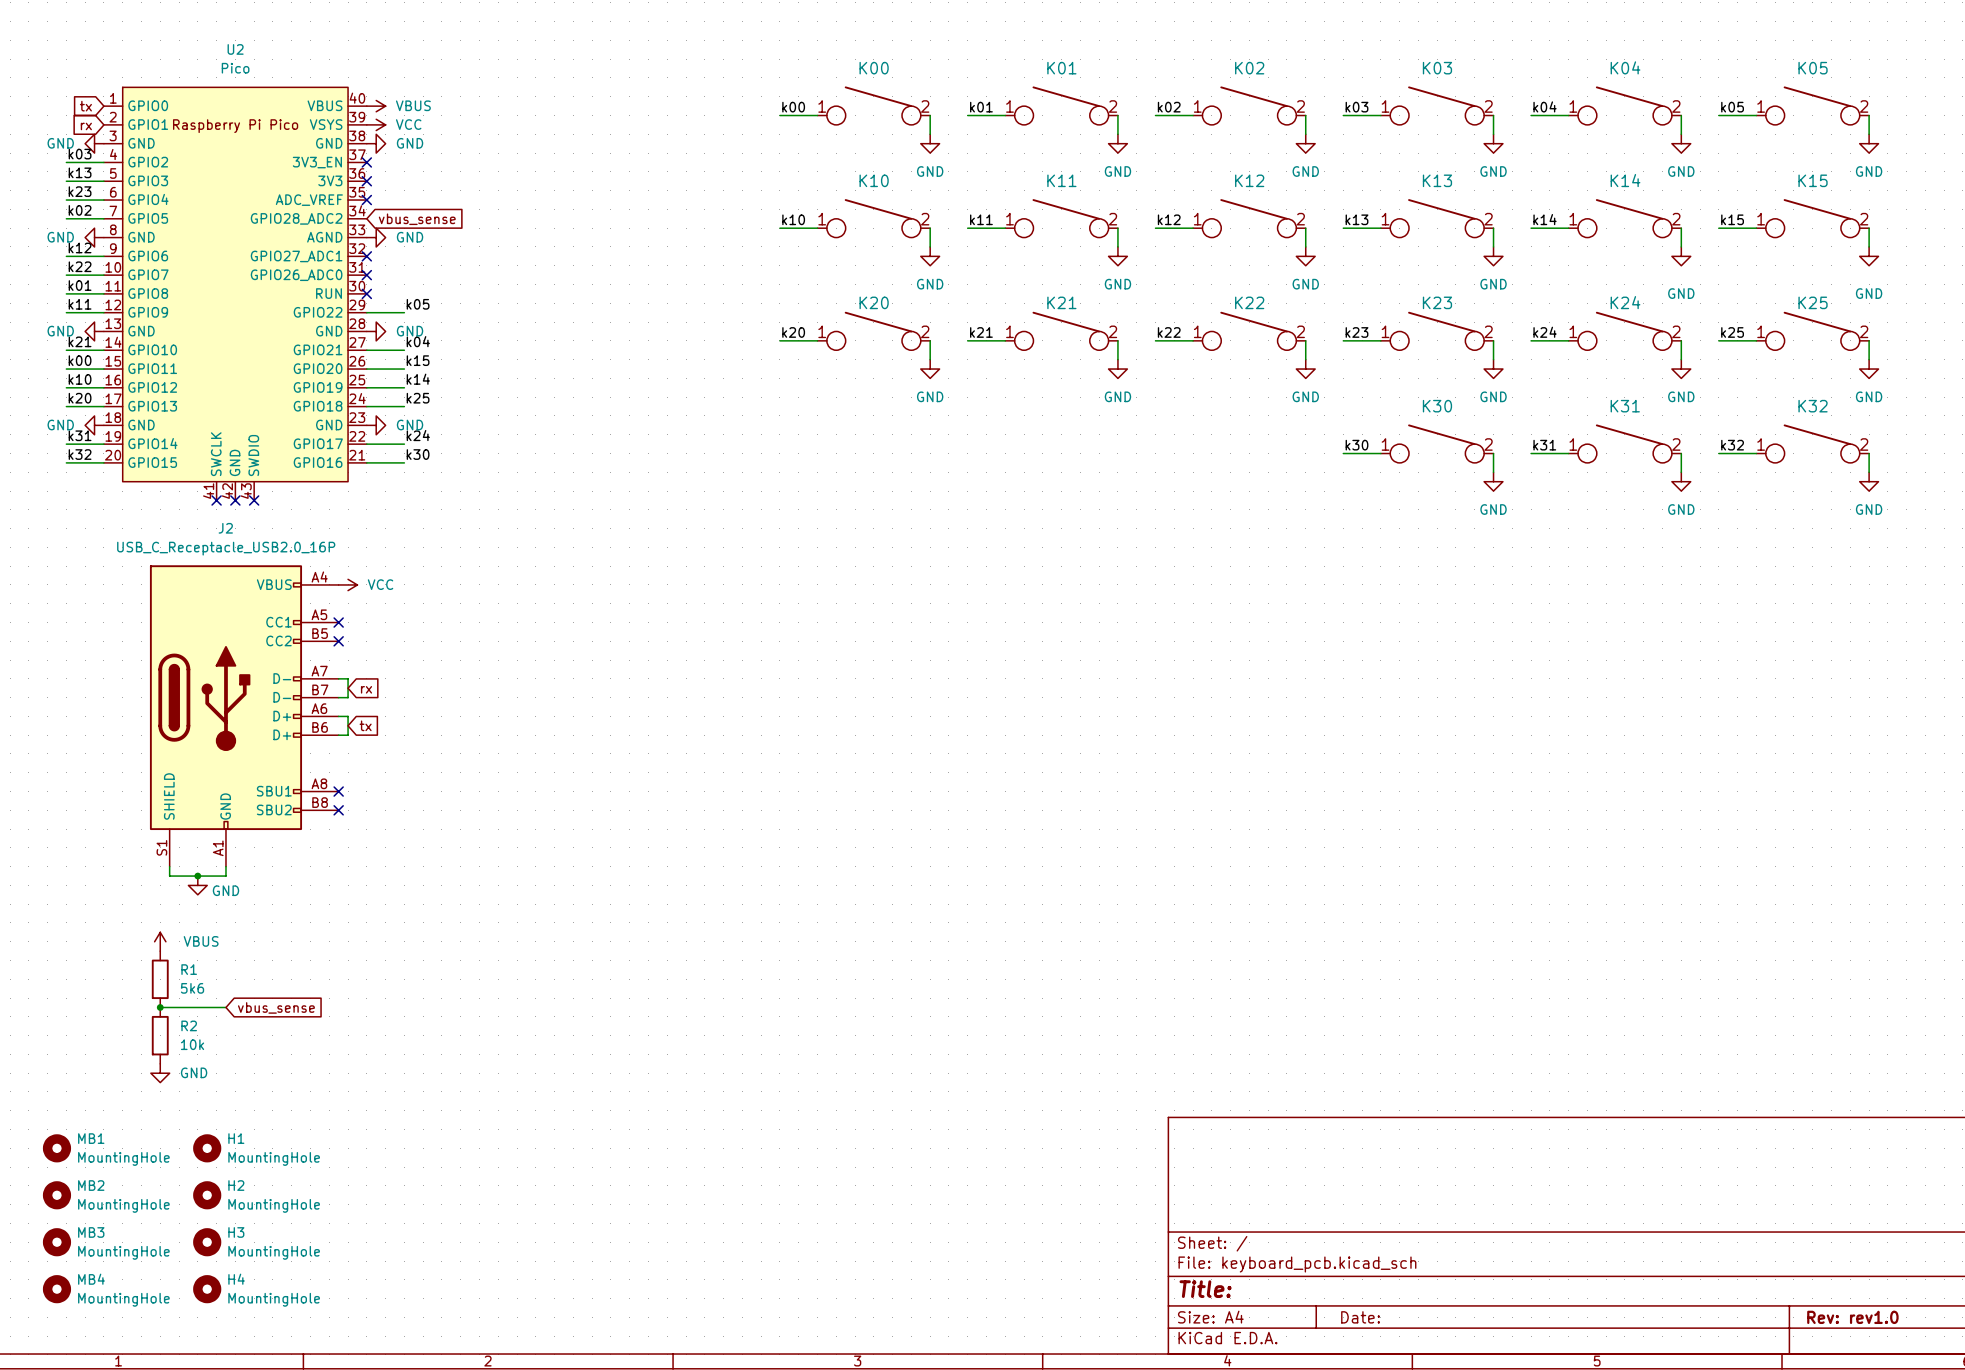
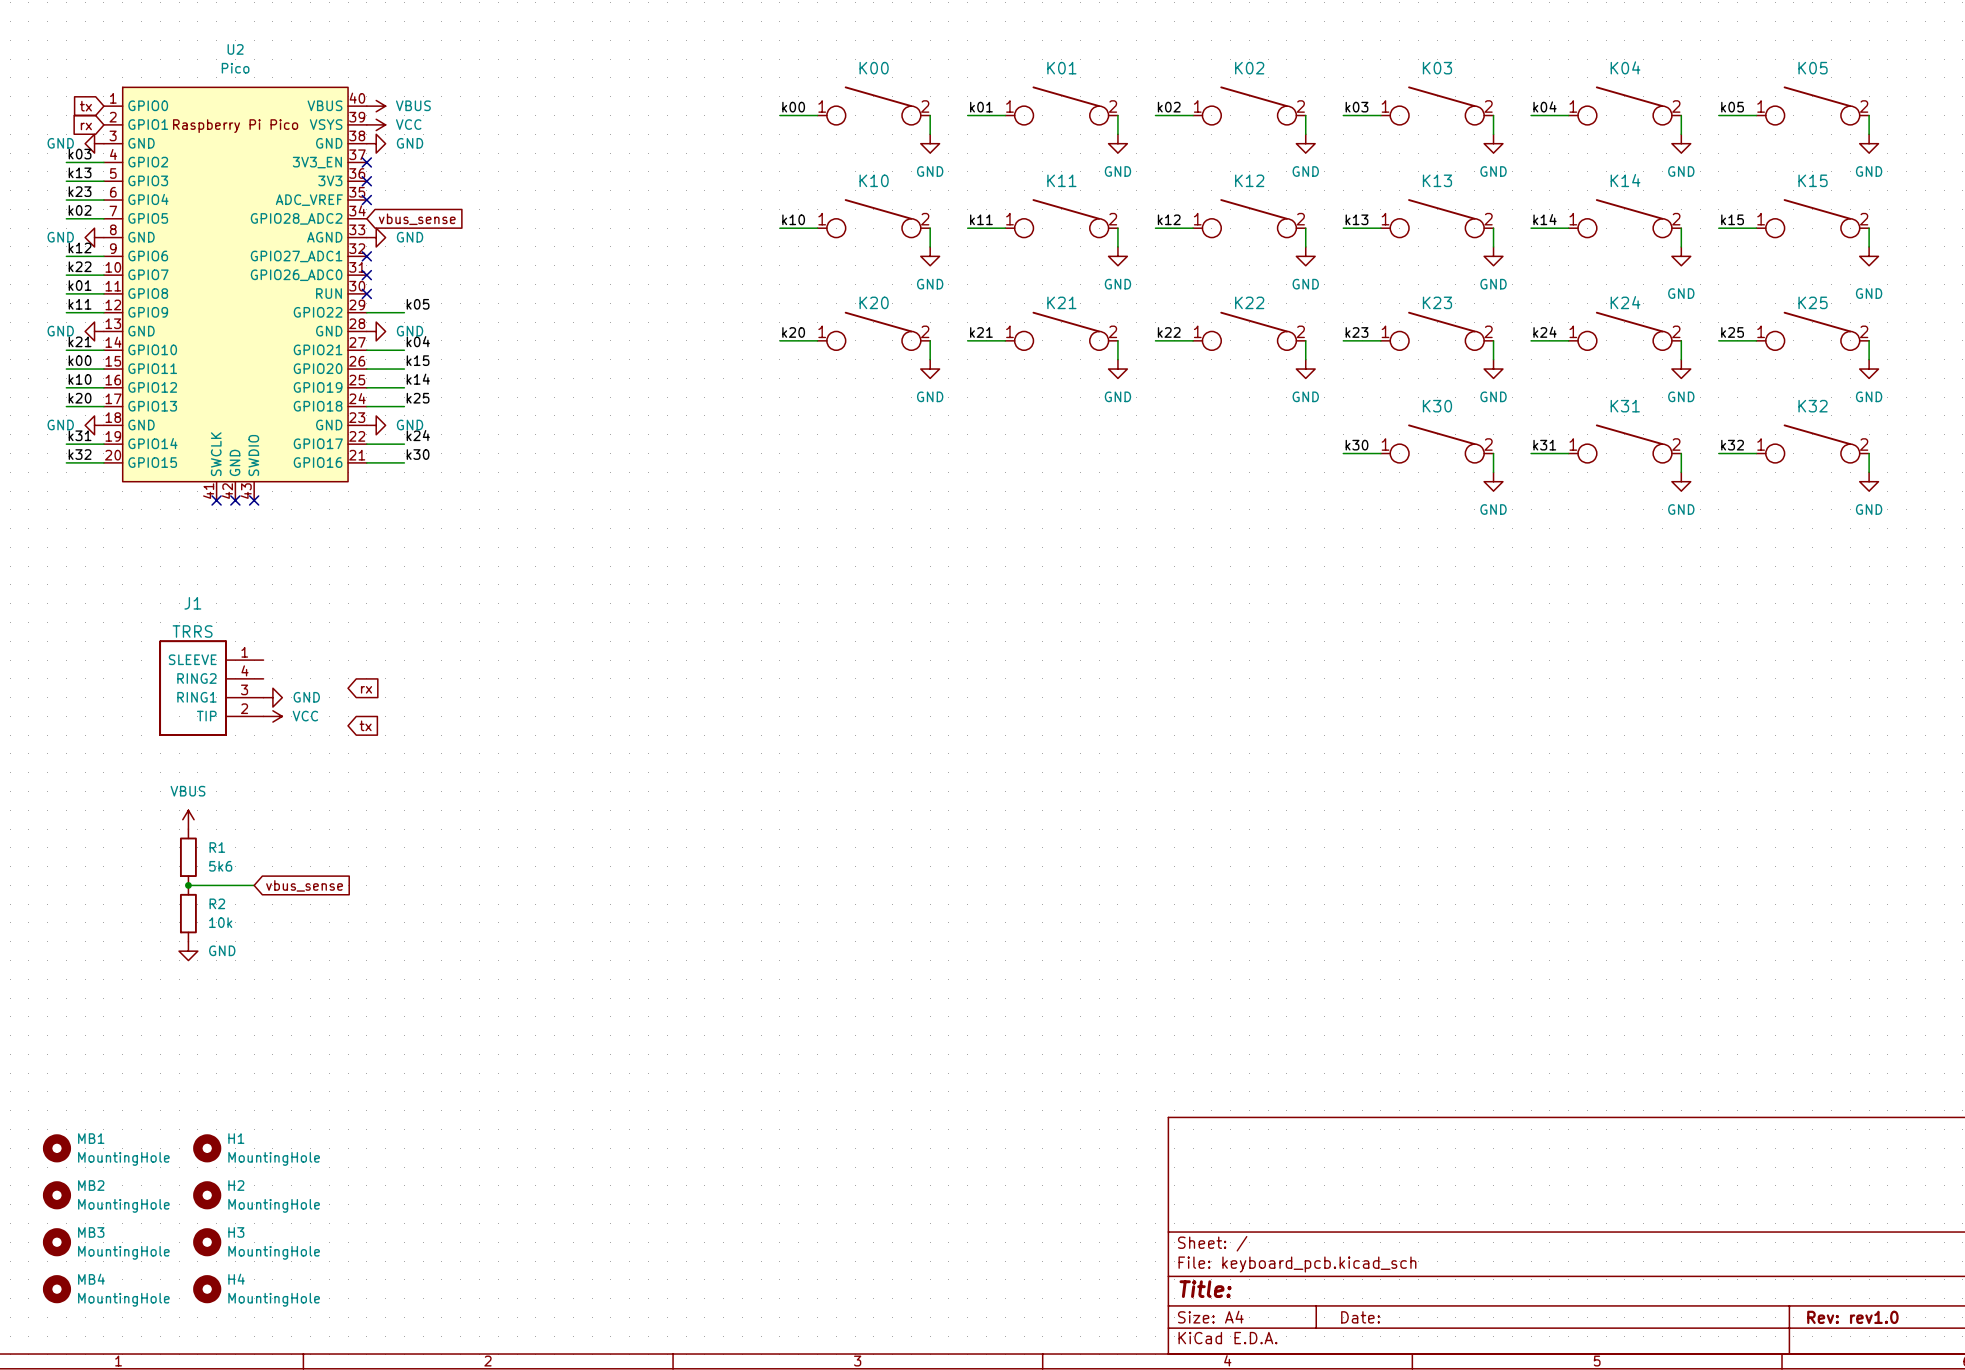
power symbol position: VCC (348, 584) -> VCC (272, 716)
no-connect mark: (338, 622) -> none
no-connect mark: (338, 641) -> none
wire: (338, 678) (348, 678) (348, 697) (338, 697) -> none
J1: none -> TRRS (211, 688)
power symbol: none -> GND (272, 697)
J2: USB_C_Receptacle_USB2.0_16P (244, 715) -> none
wire: (338, 716) (348, 716) (348, 735) (338, 735) -> none
no-connect mark: (338, 791) -> none
no-connect mark: (338, 810) -> none
wire: (169, 866) (169, 876) (225, 876) (225, 866) -> none
junction position: (197, 876) -> (188, 885)
power symbol: GND (197, 885) -> none
power symbol position: VBUS (160, 941) -> VBUS (188, 819)
power symbol text position: VBUS (201, 941) -> VBUS (187, 791)
power symbol: none -> GND (188, 951)
R1 position: (160, 979) -> (188, 857)
wire: (160, 1007) (225, 1007) -> (188, 885) (254, 885)
junction: (160, 1007) -> none
global label position: vbus_sense (276, 1007) -> vbus_sense (304, 885)
R2 position: (160, 1035) -> (188, 913)
power symbol: GND (160, 1073) -> none

